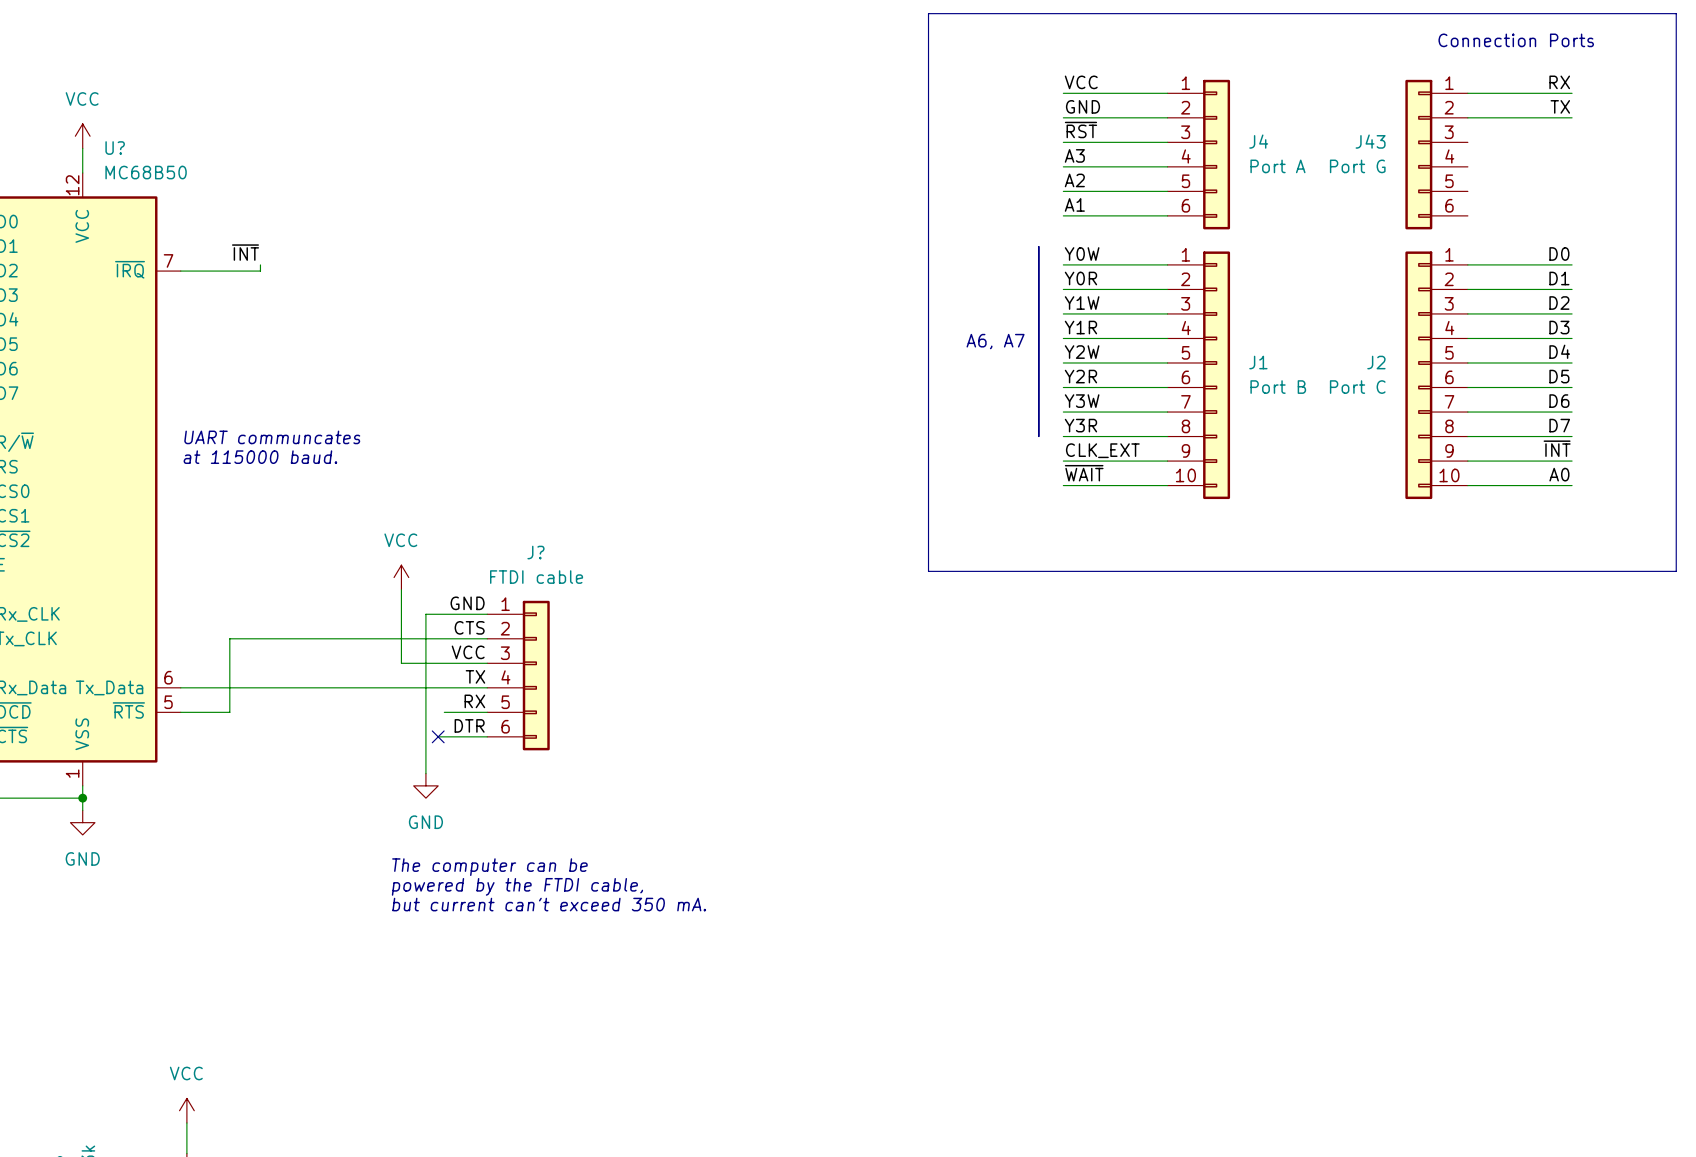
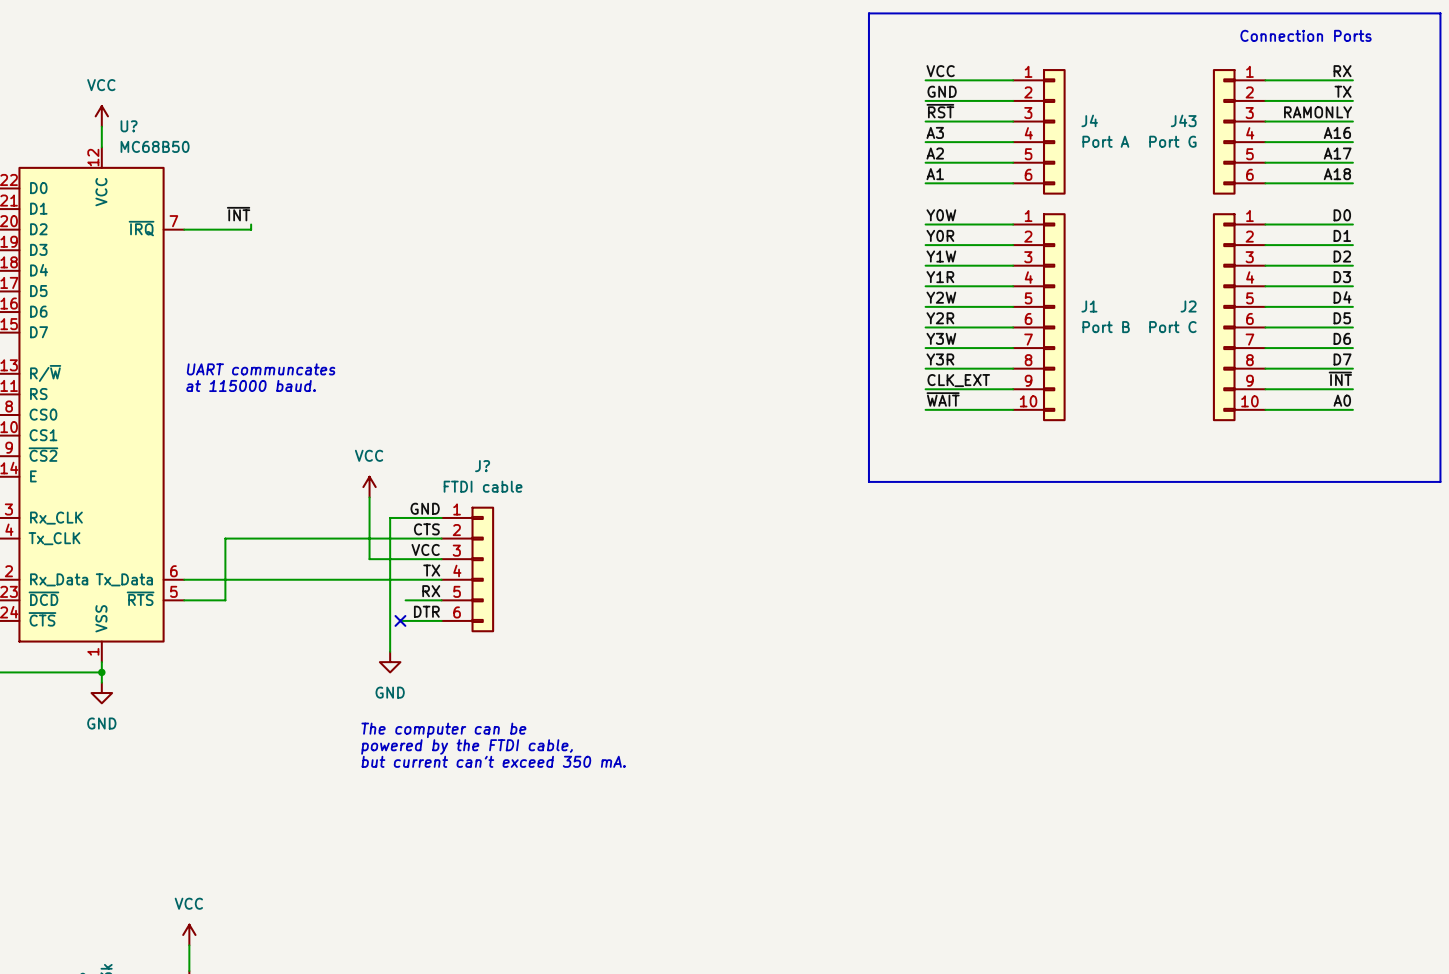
line: (995, 13) (928, 13) (928, 571) (995, 571) -> (868, 13) (868, 481)
label: none -> RAMONLY (1318, 112)
wire: none -> (1265, 121) (1352, 121)
label: none -> A16 (1337, 132)
wire: none -> (1265, 142) (1352, 142)
label: none -> A17 (1337, 153)
wire: none -> (1265, 162) (1352, 162)
label: none -> A18 (1337, 174)
wire: none -> (1265, 183) (1352, 183)
line: (1038, 246) (1038, 436) -> none
text: A6, A7 (995, 341) -> none

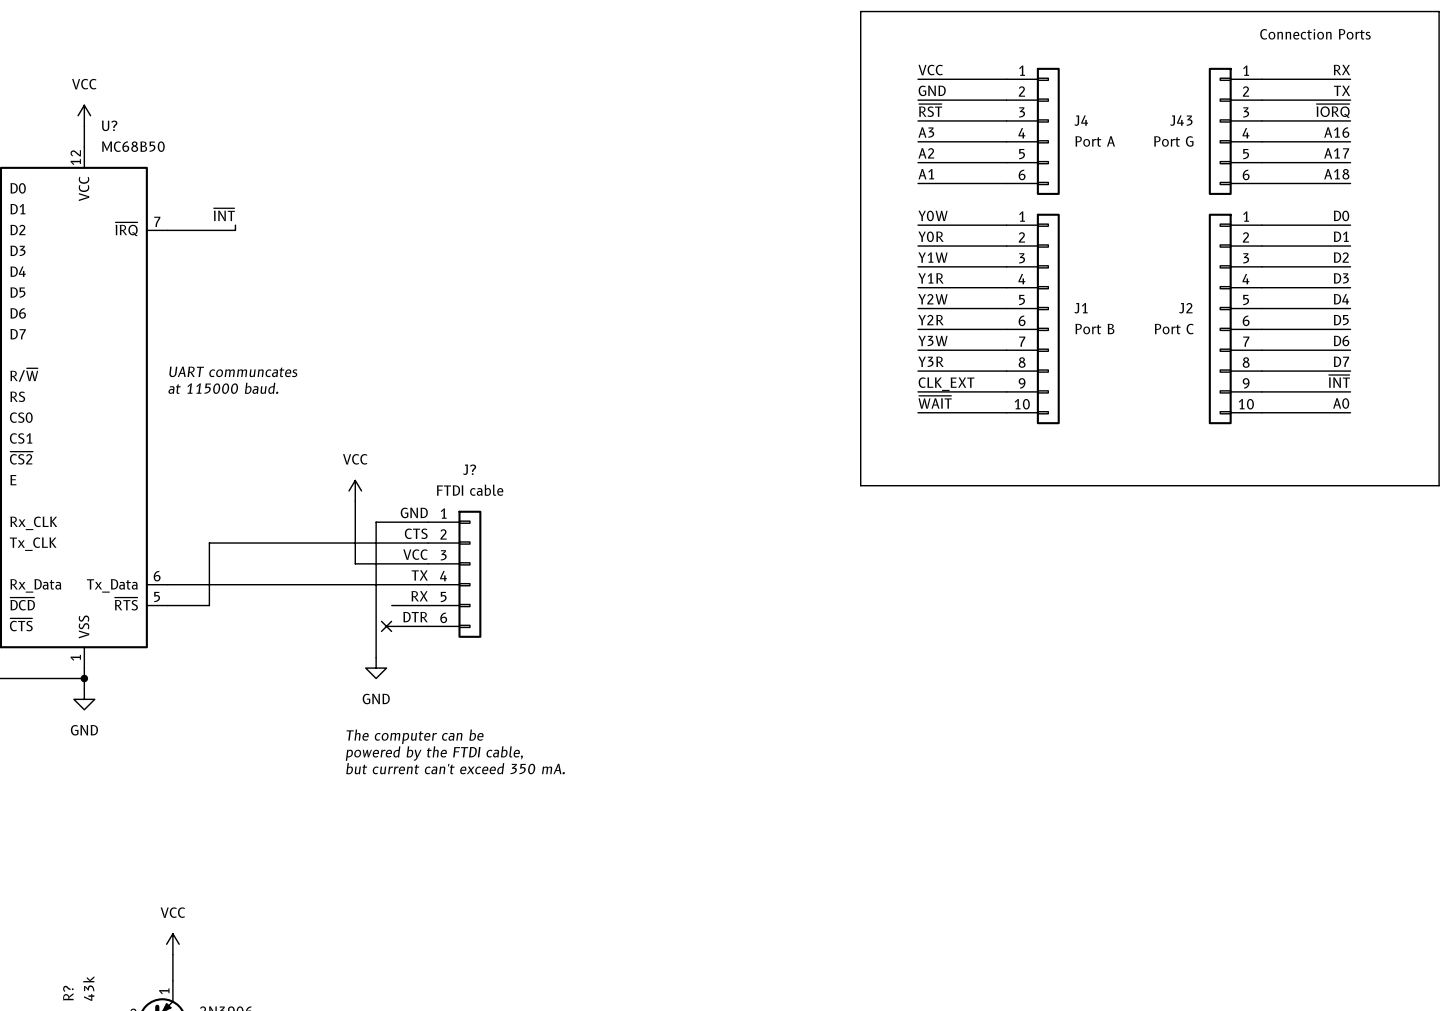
label: RAMONLY (1318, 112) -> ~{IORQ} (1333, 110)

